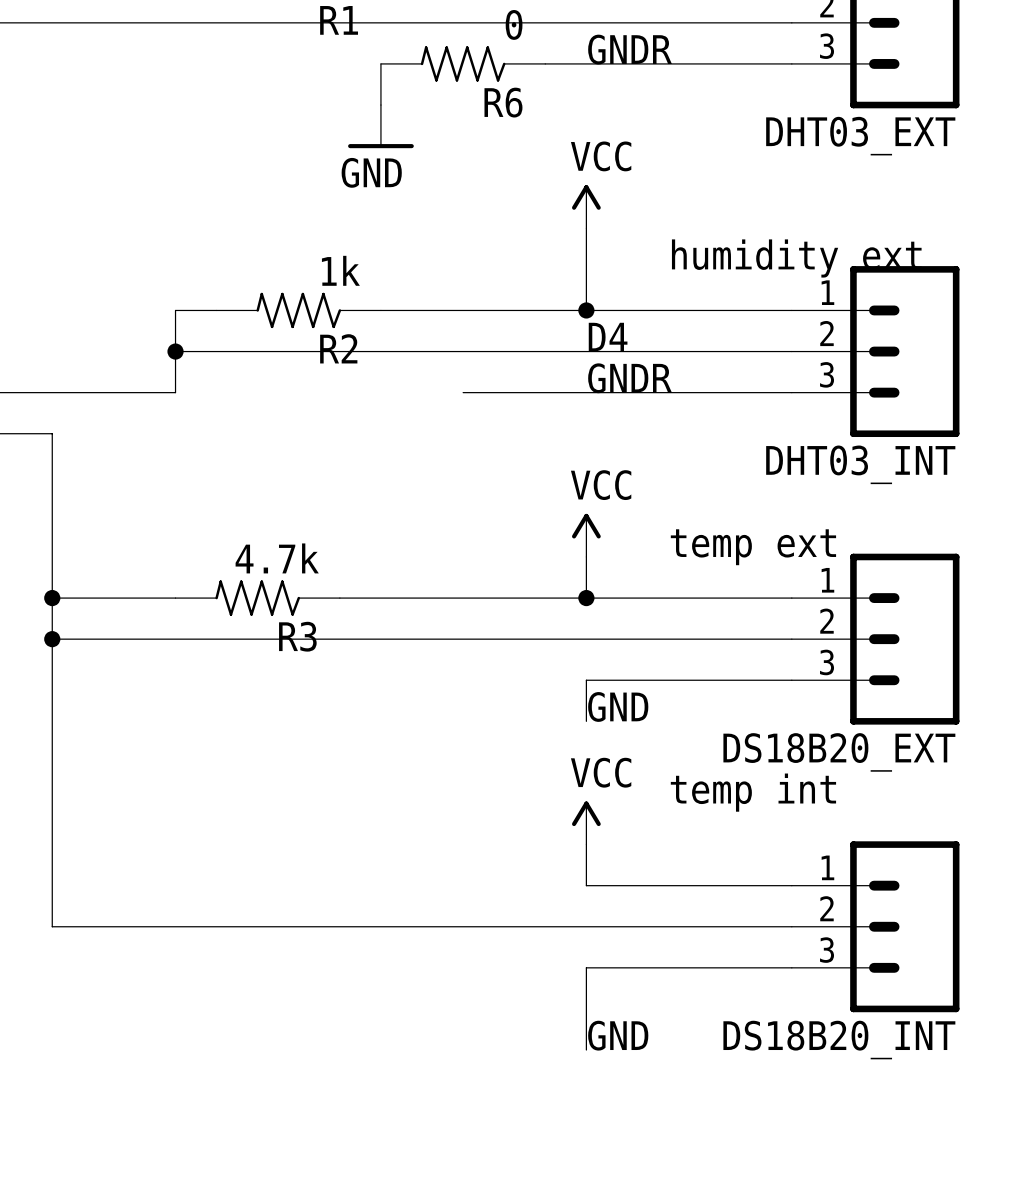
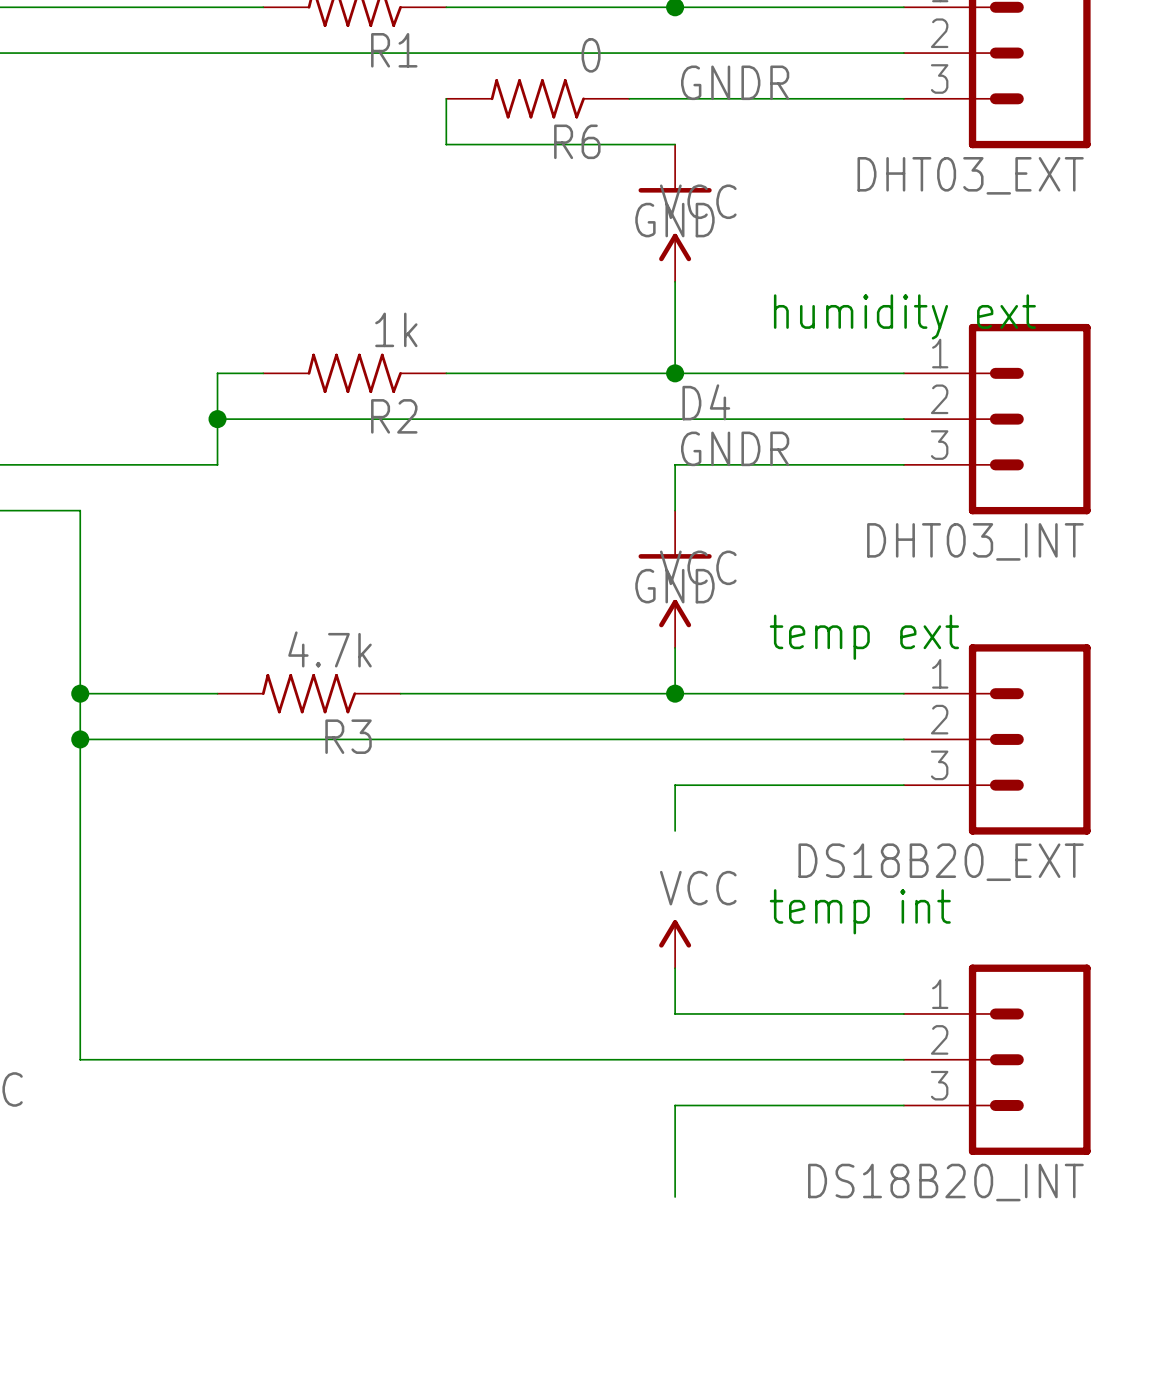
wire: none -> (446, 144) (675, 144)
power symbol: GND (380, 126) -> none
power symbol: none -> GND (675, 168)
wire: (463, 392) (586, 392) -> (675, 510) (675, 464)
power symbol: none -> GND (675, 534)
label: GND (618, 706) -> none
label: GND (618, 1035) -> none

